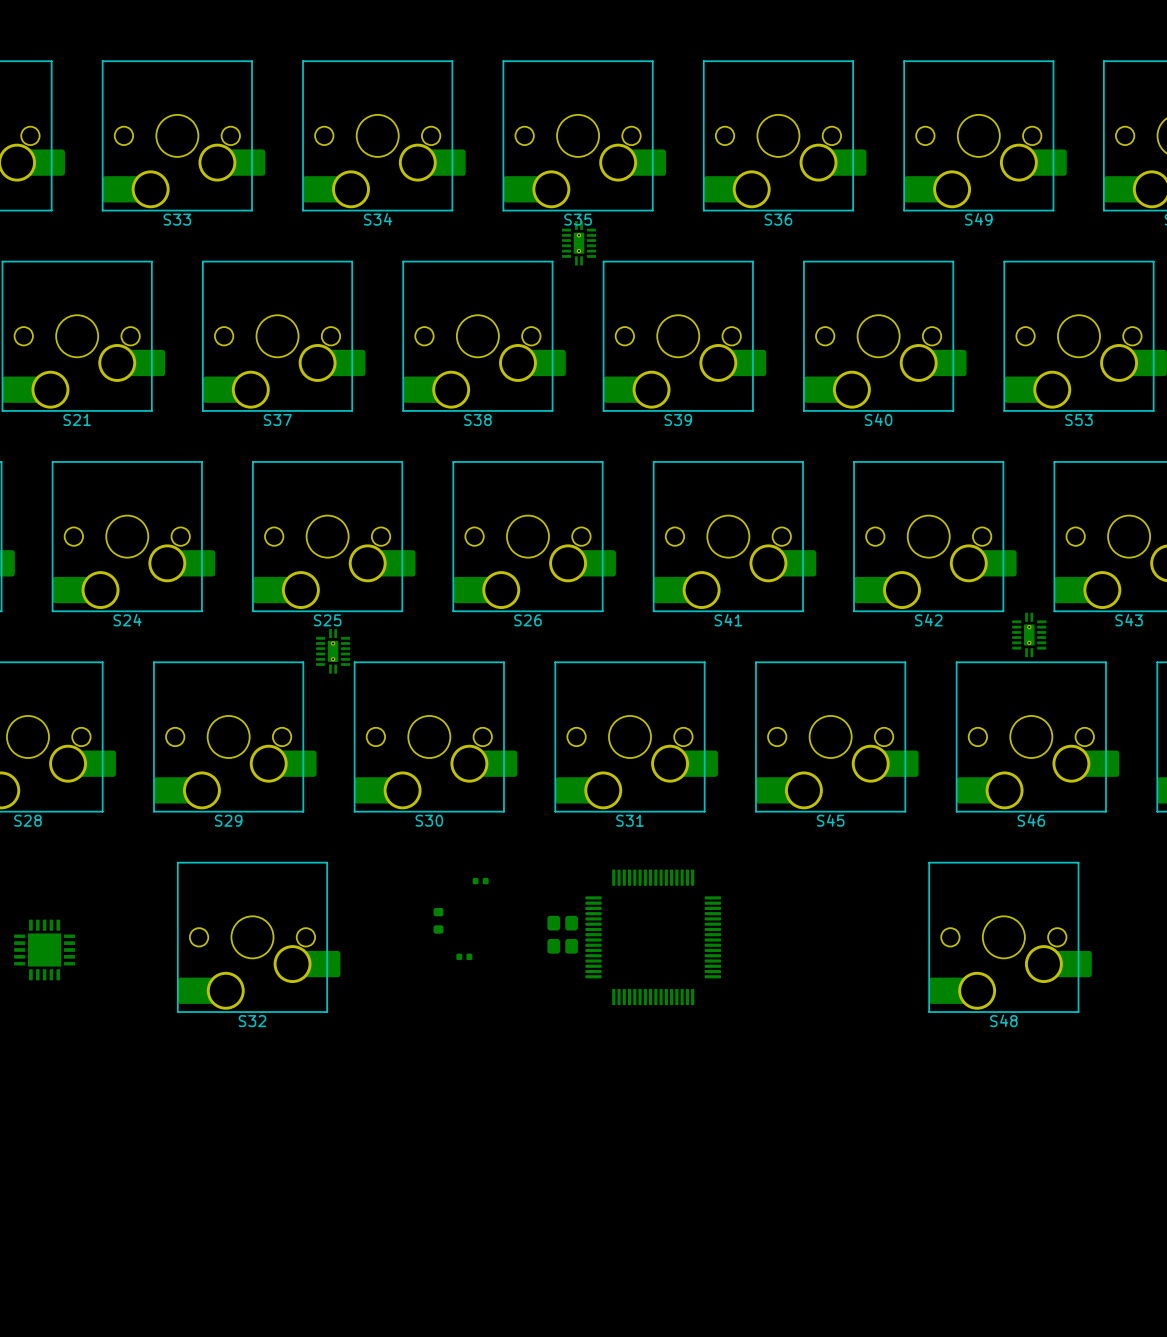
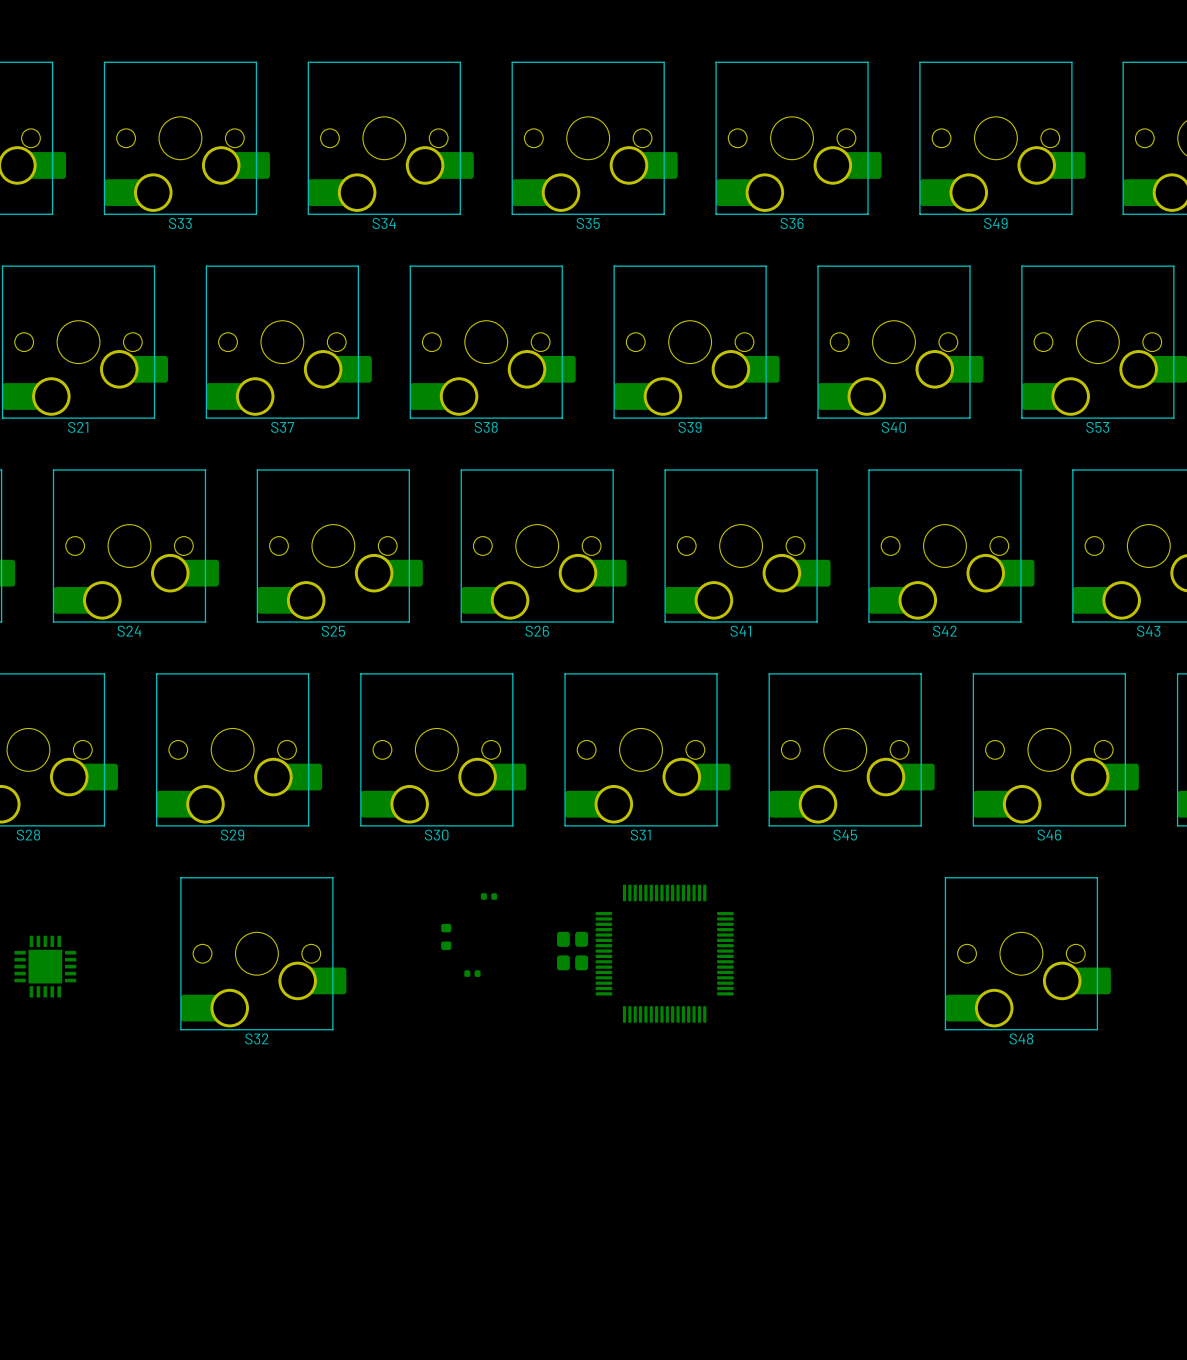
part: (578, 243) -> none
part: (1029, 634) -> none
part: (333, 651) -> none

